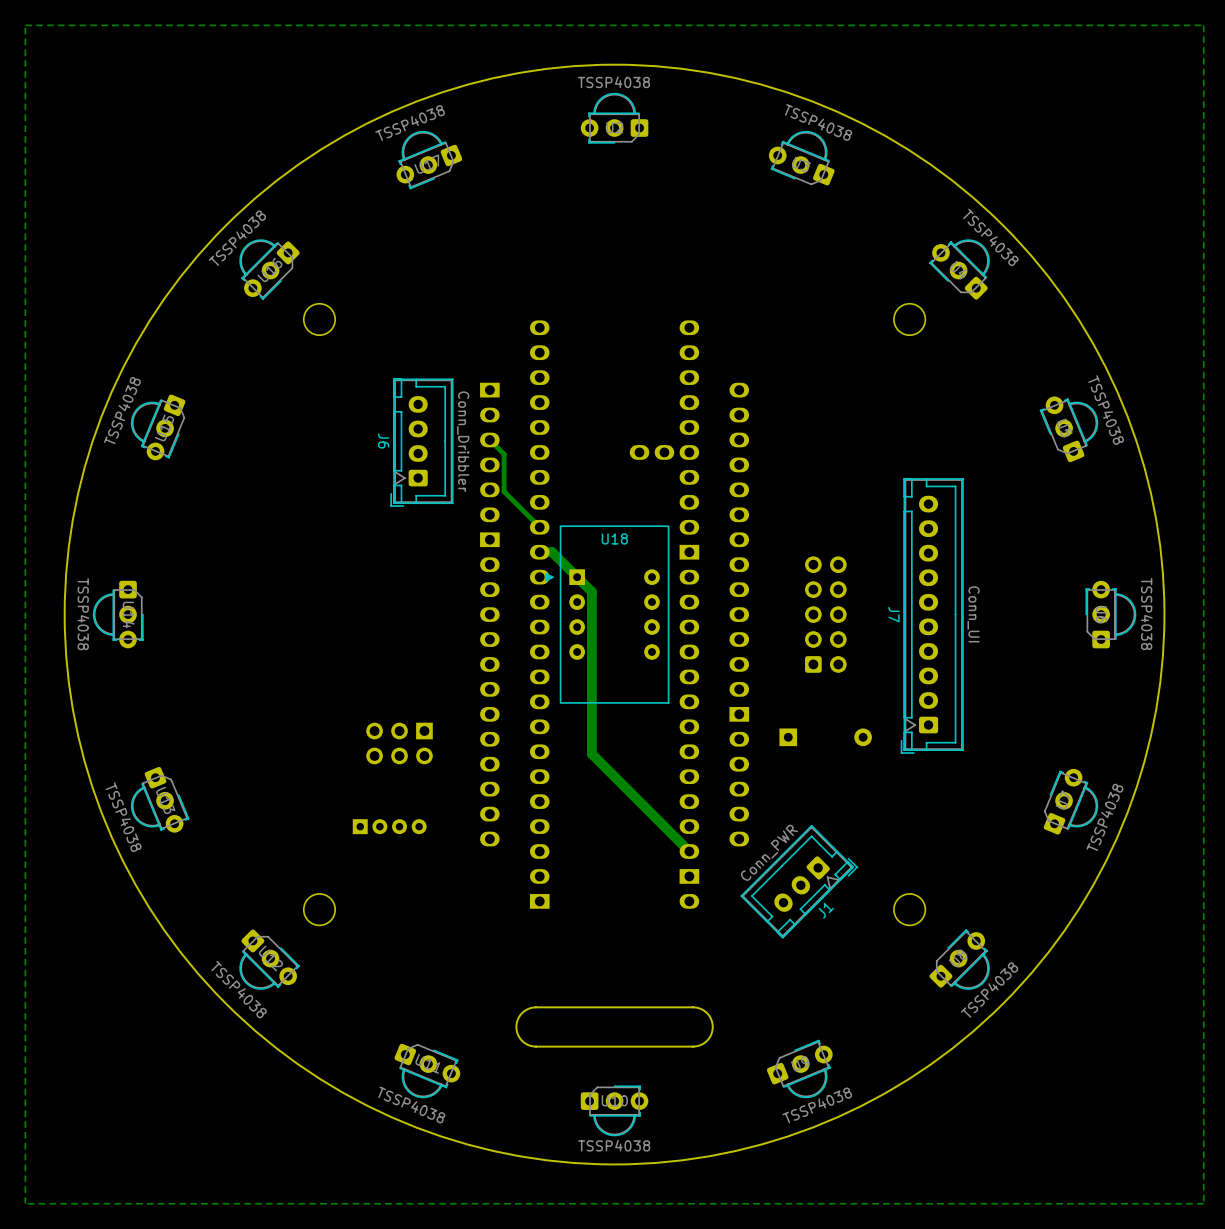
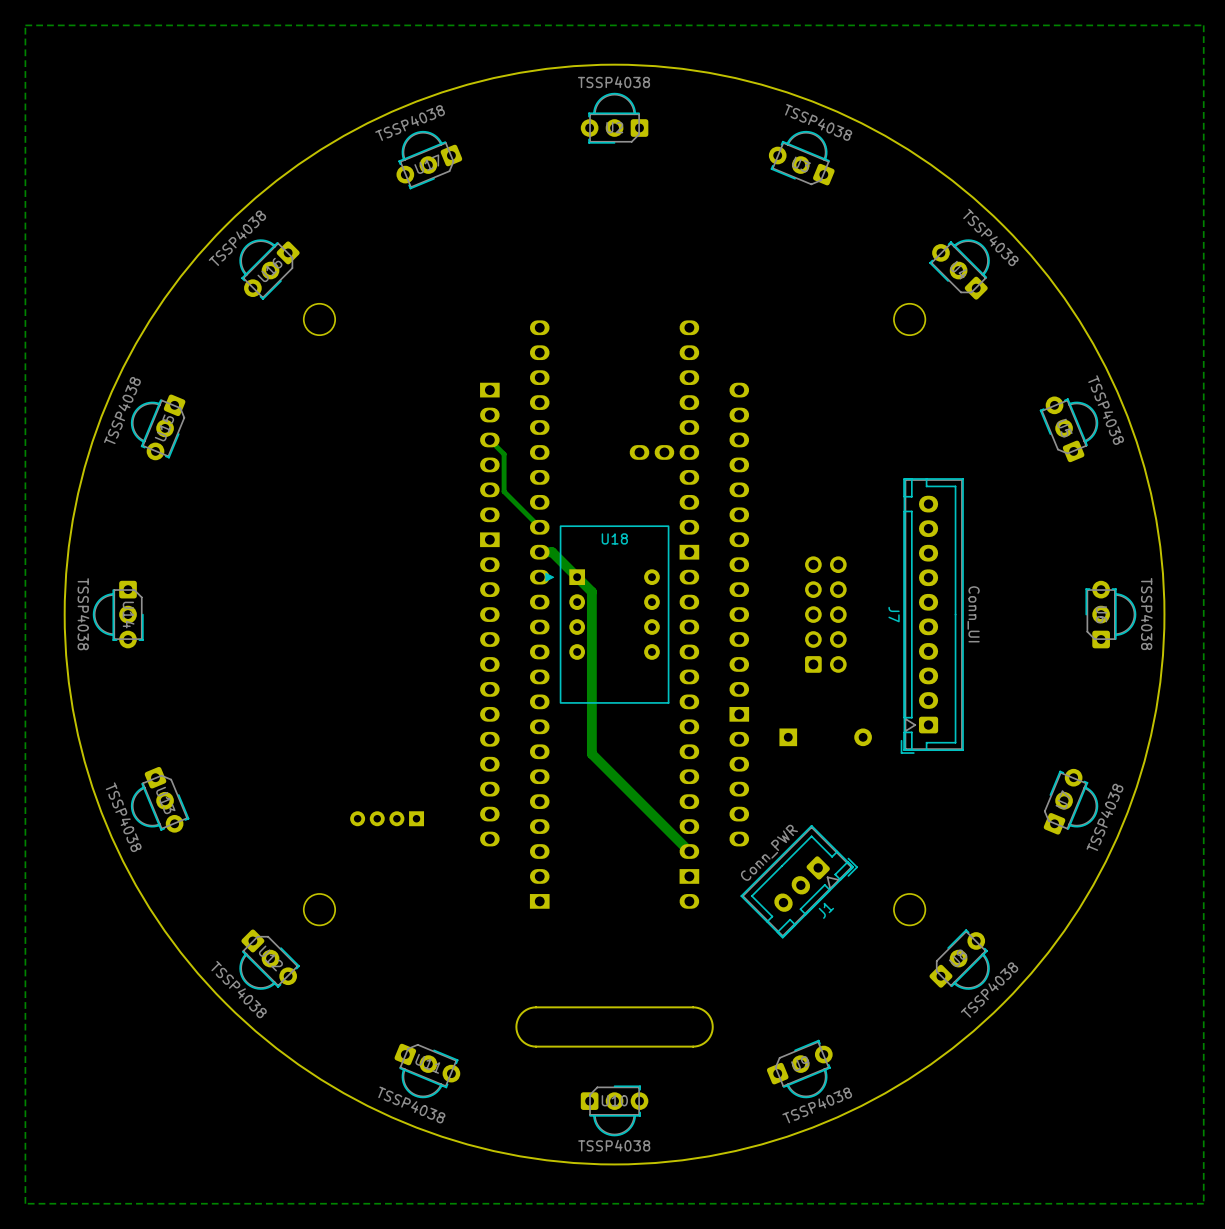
J6: Conn_Dribbler (421, 442) -> none
part: (399, 743) -> none
part rotation: 0° (389, 826) -> 180° (387, 818)

